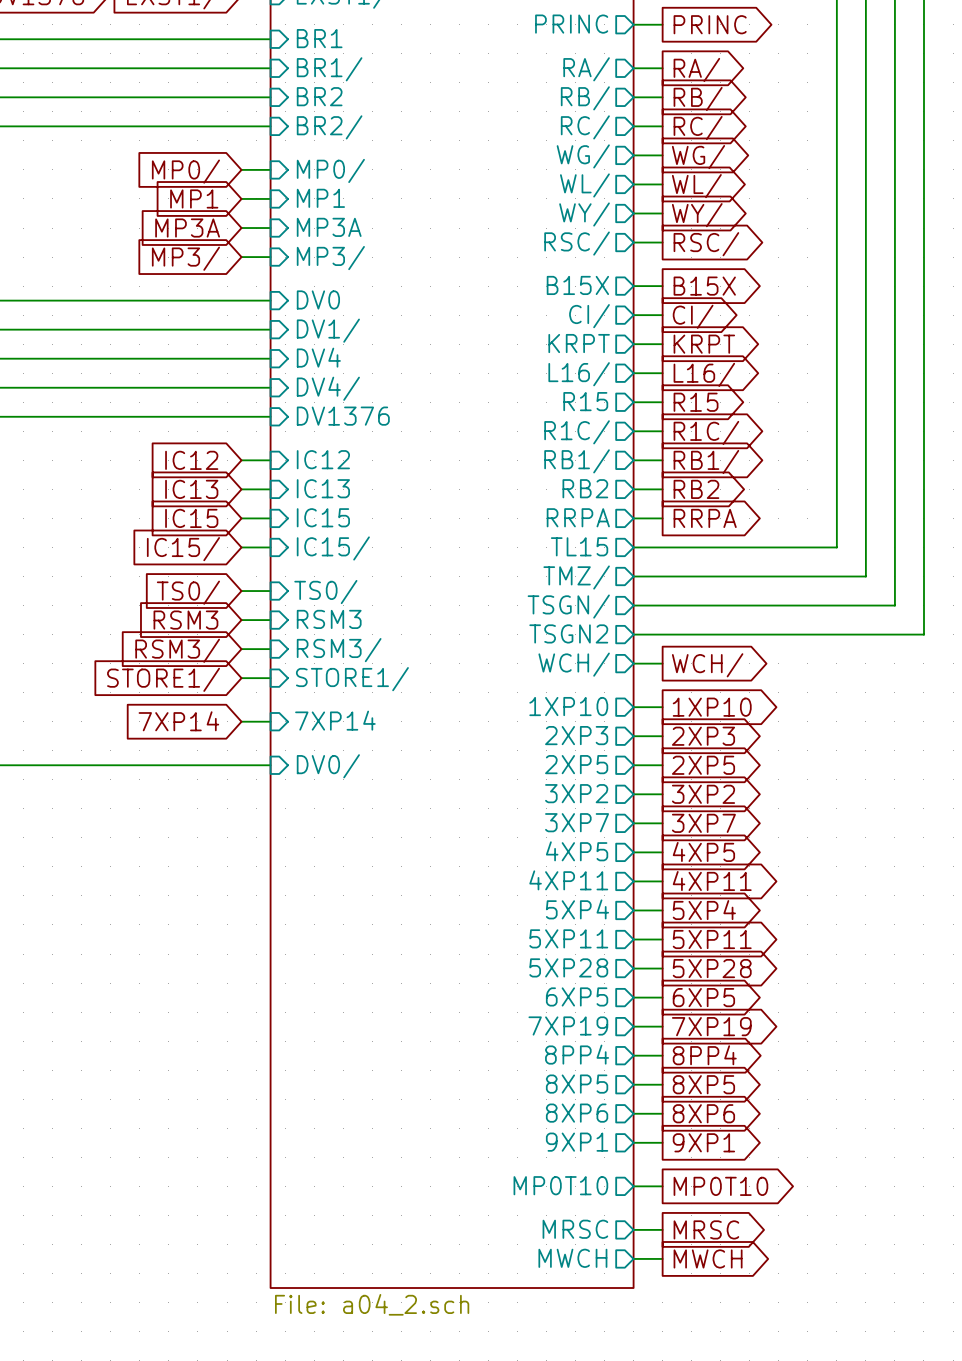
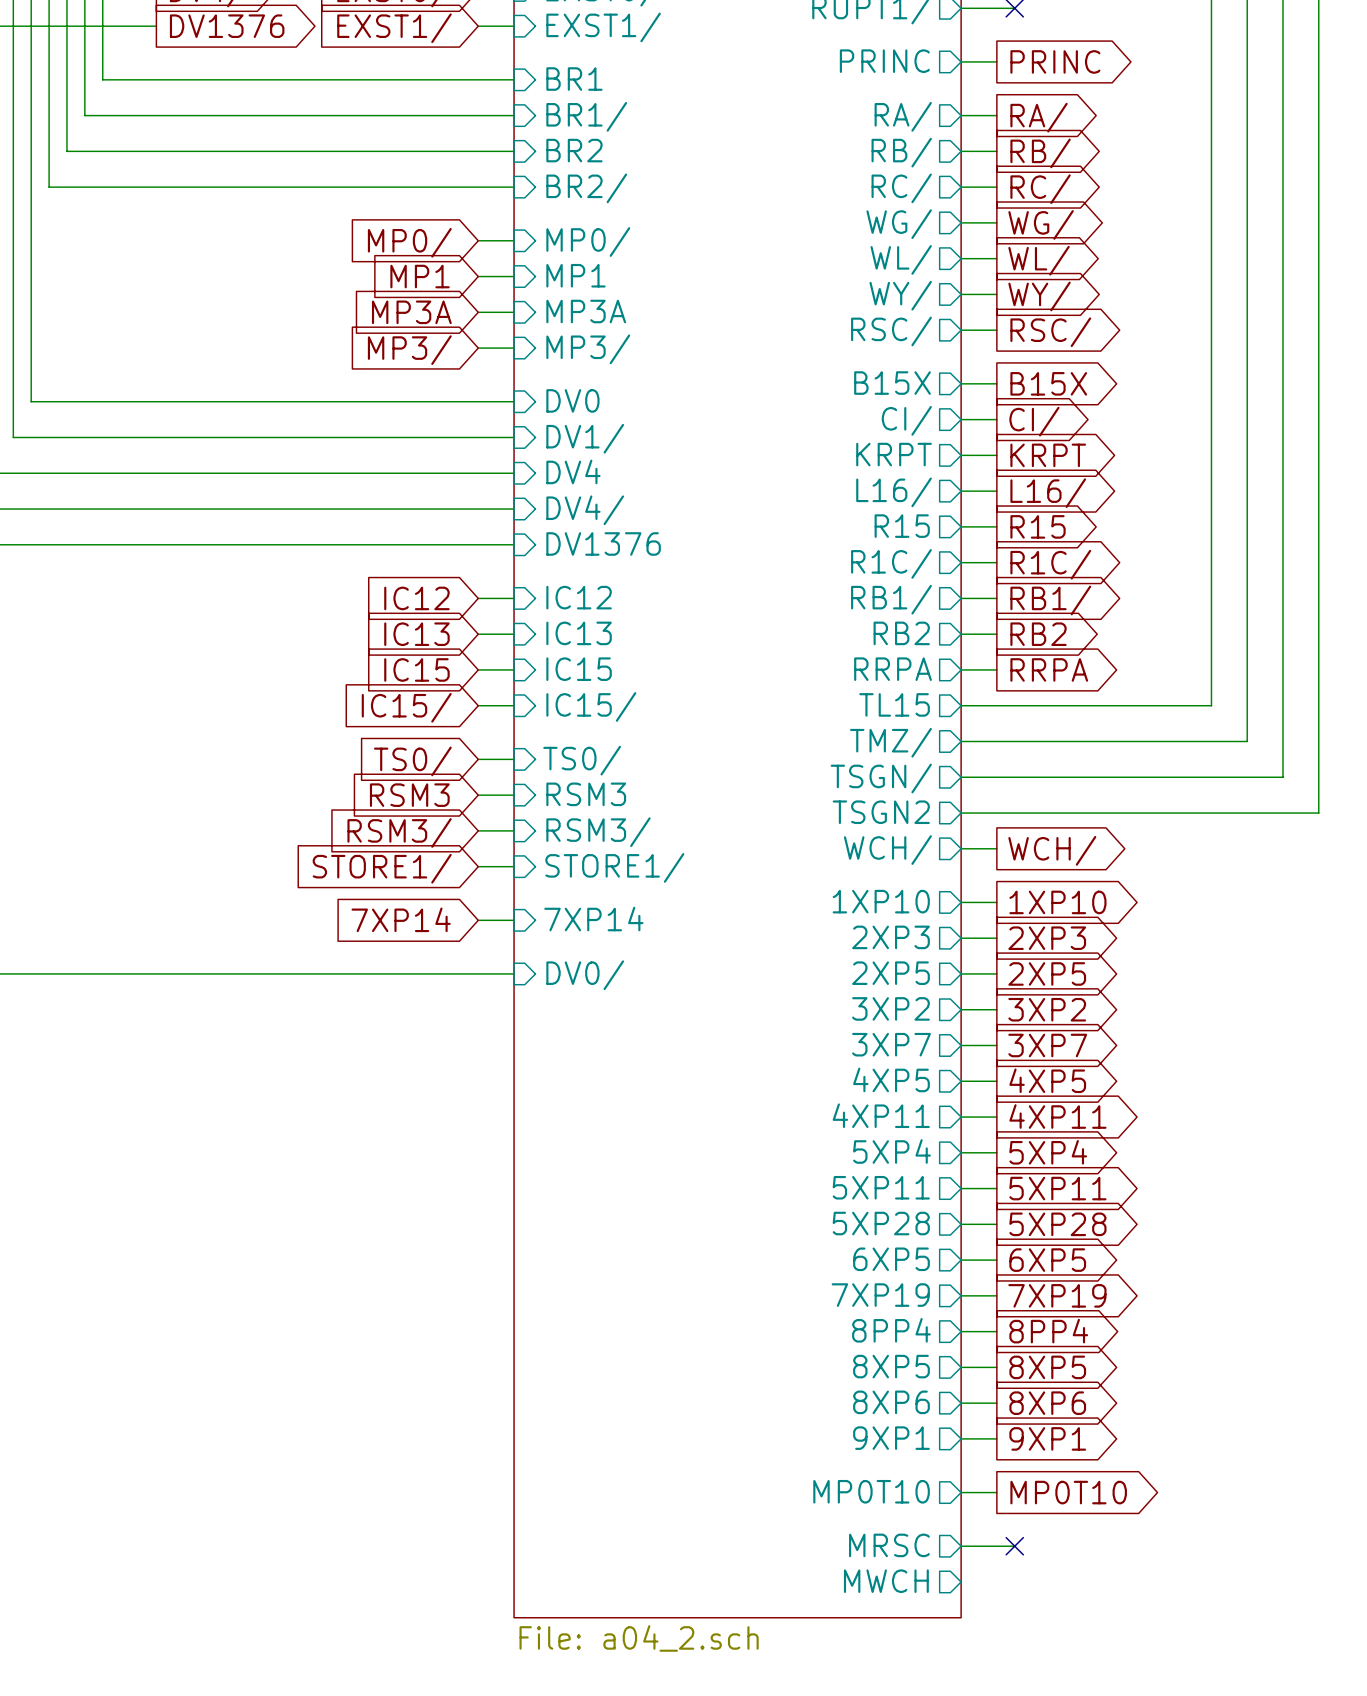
wire: none -> (996, 1546) (1014, 1546)
no-connect mark: none -> (1014, 1546)
global label: MRSC (706, 1229) -> none
wire: (633, 1258) (662, 1258) -> none
global label: MWCH (708, 1258) -> none

